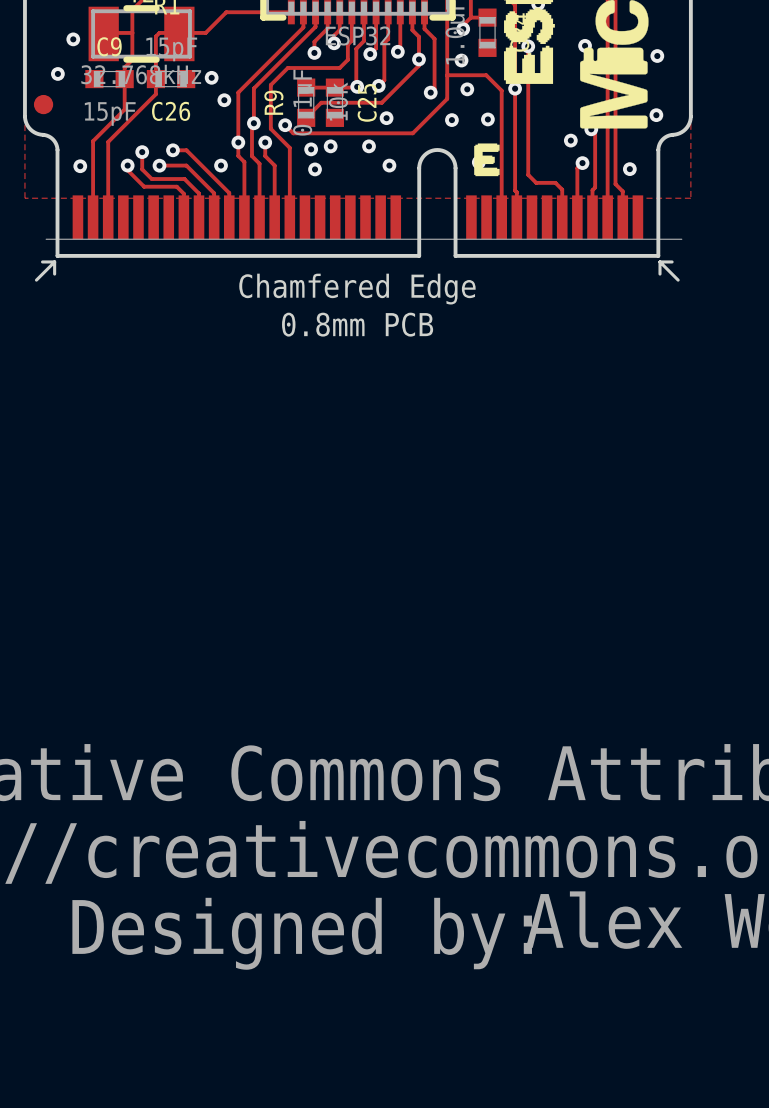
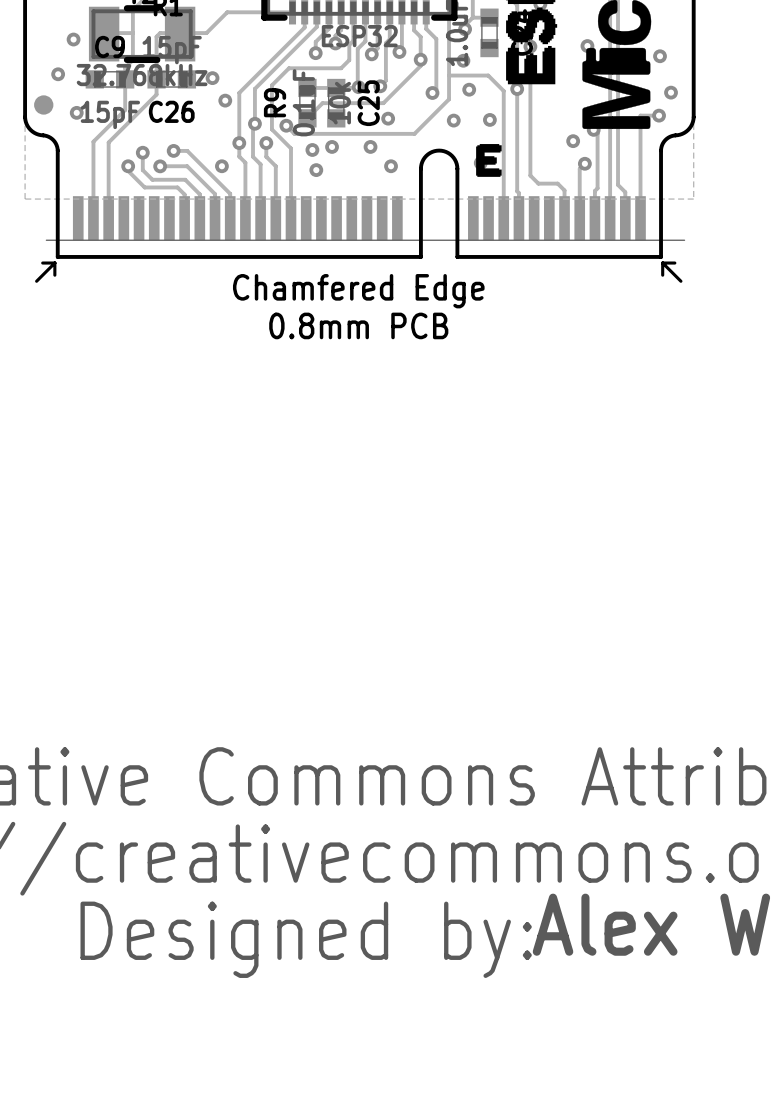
track: none -> (659, 115) (640, 115) (640, 218)
via position: (80, 166) -> (76, 112)
via position: (629, 169) -> (671, 92)

